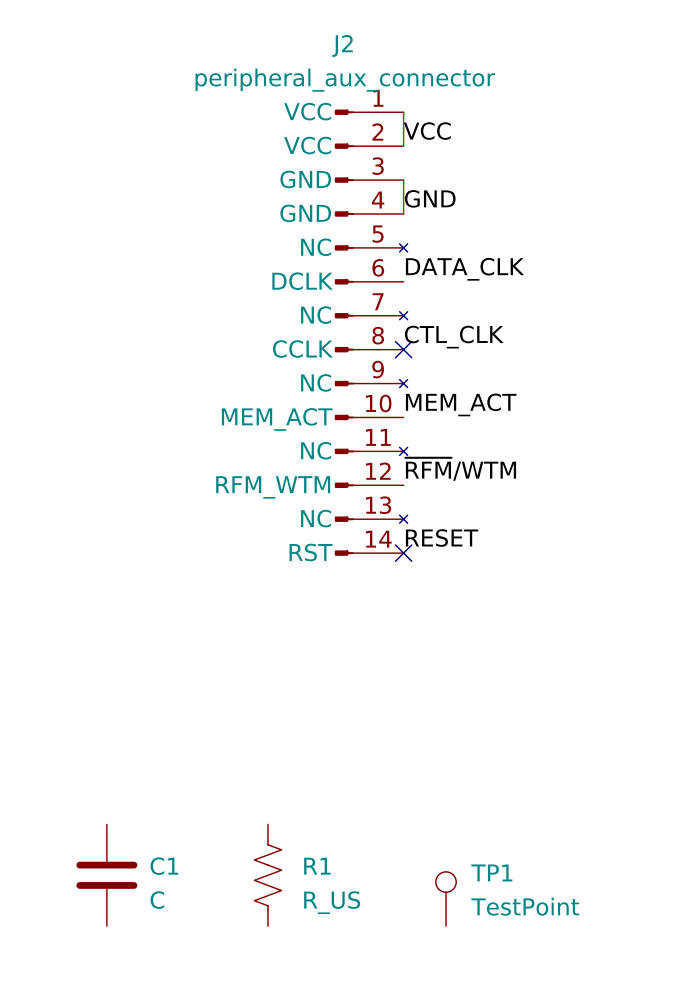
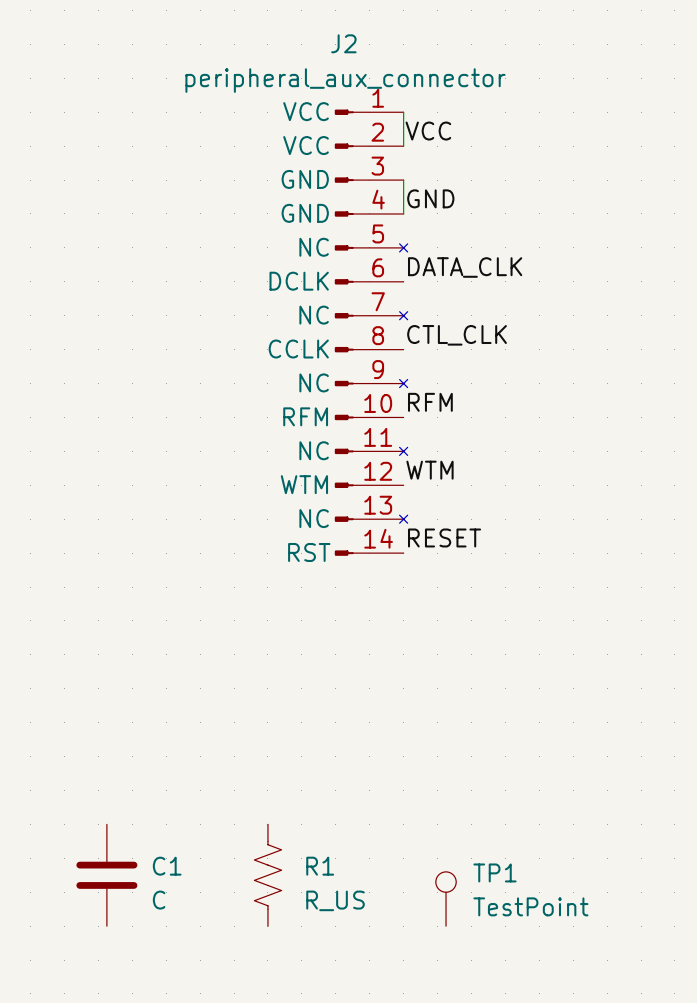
no-connect mark: (403, 349) -> none
label: MEM_ACT (461, 404) -> RFM (430, 402)
J2 pin name: MEM_ACT (277, 419) -> RFM (305, 416)
label: ~{RFM}/WTM (460, 469) -> WTM (429, 470)
J2 pin name: RFM_WTM (273, 487) -> WTM (304, 484)
no-connect mark: (403, 553) -> none

